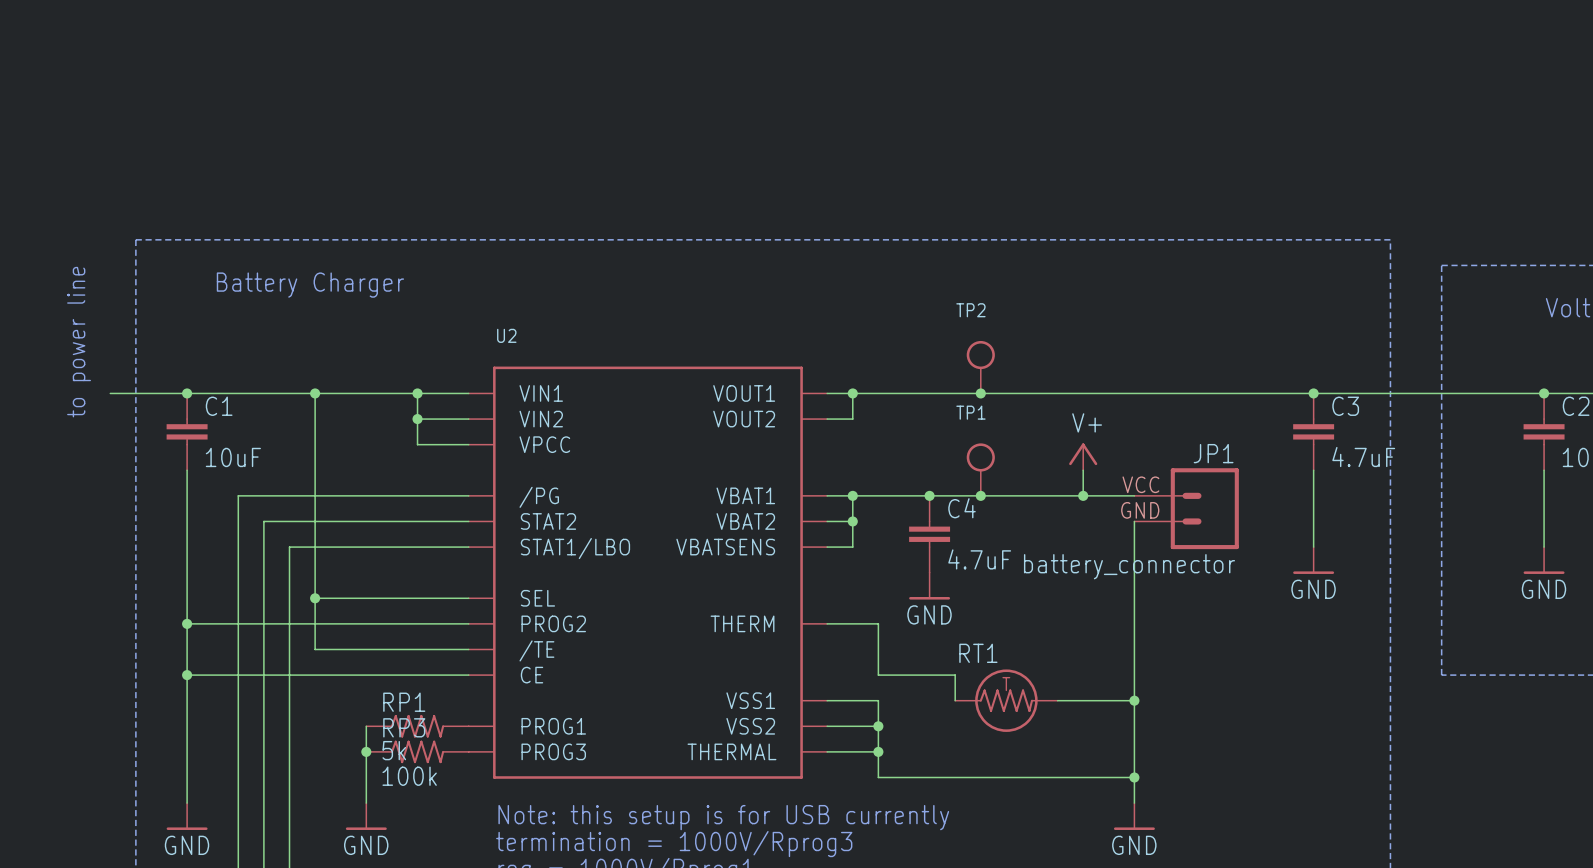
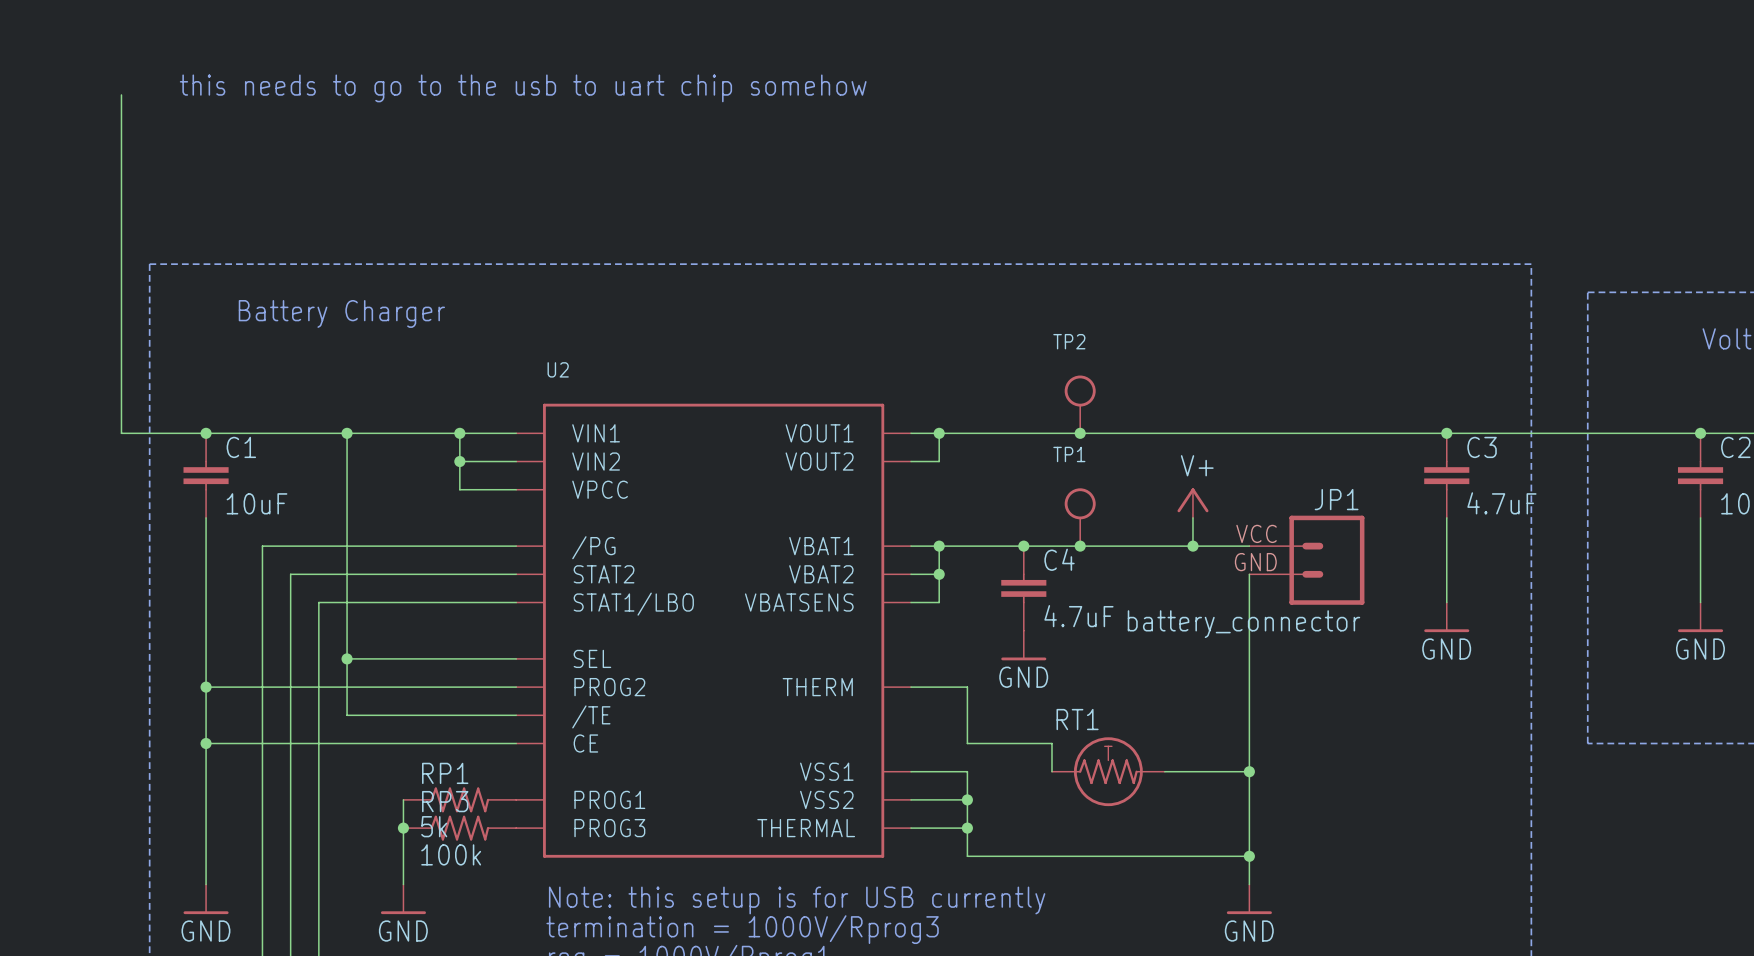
text: none -> this needs to go to the usb to uart chip somehow (523, 88)
wire: none -> (121, 94) (121, 433)
text: to power line (79, 342) -> none

